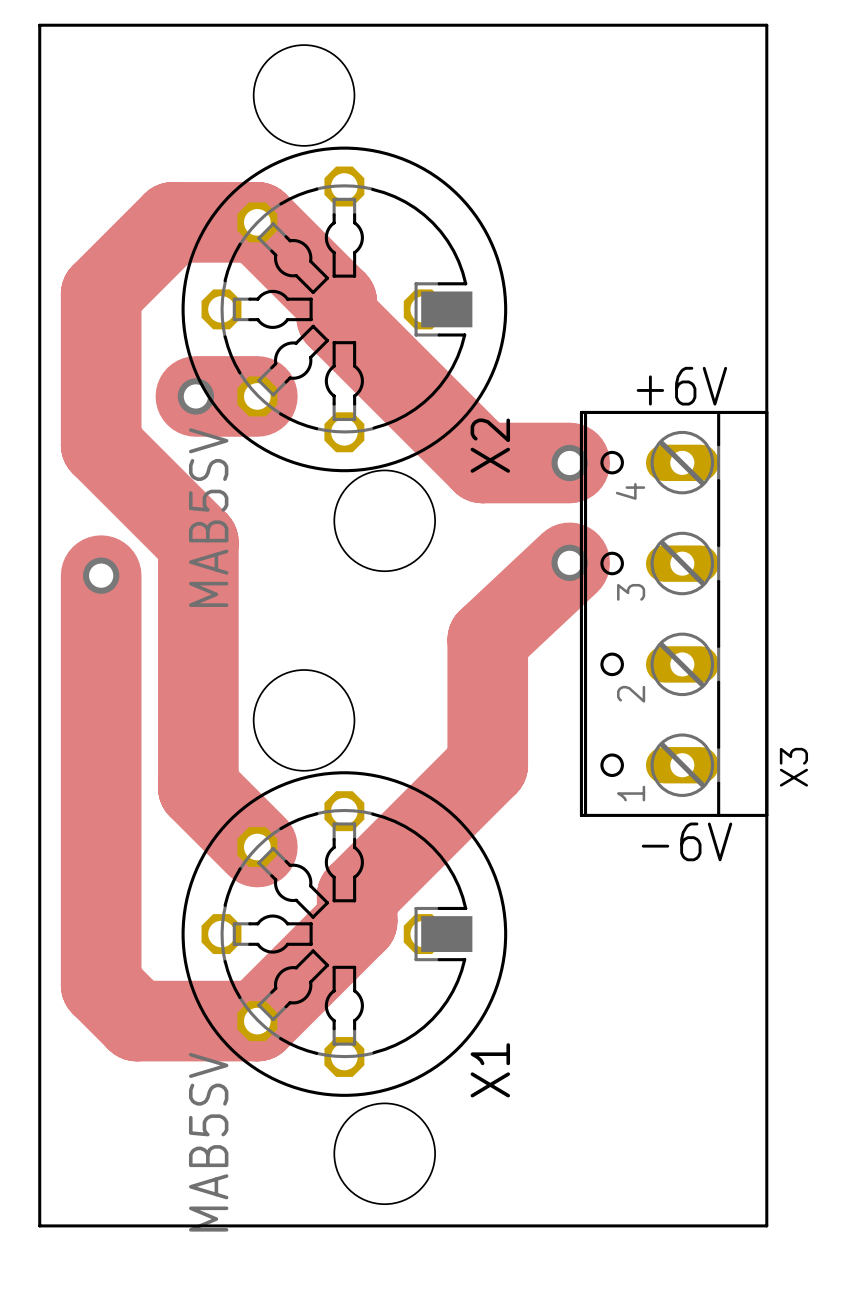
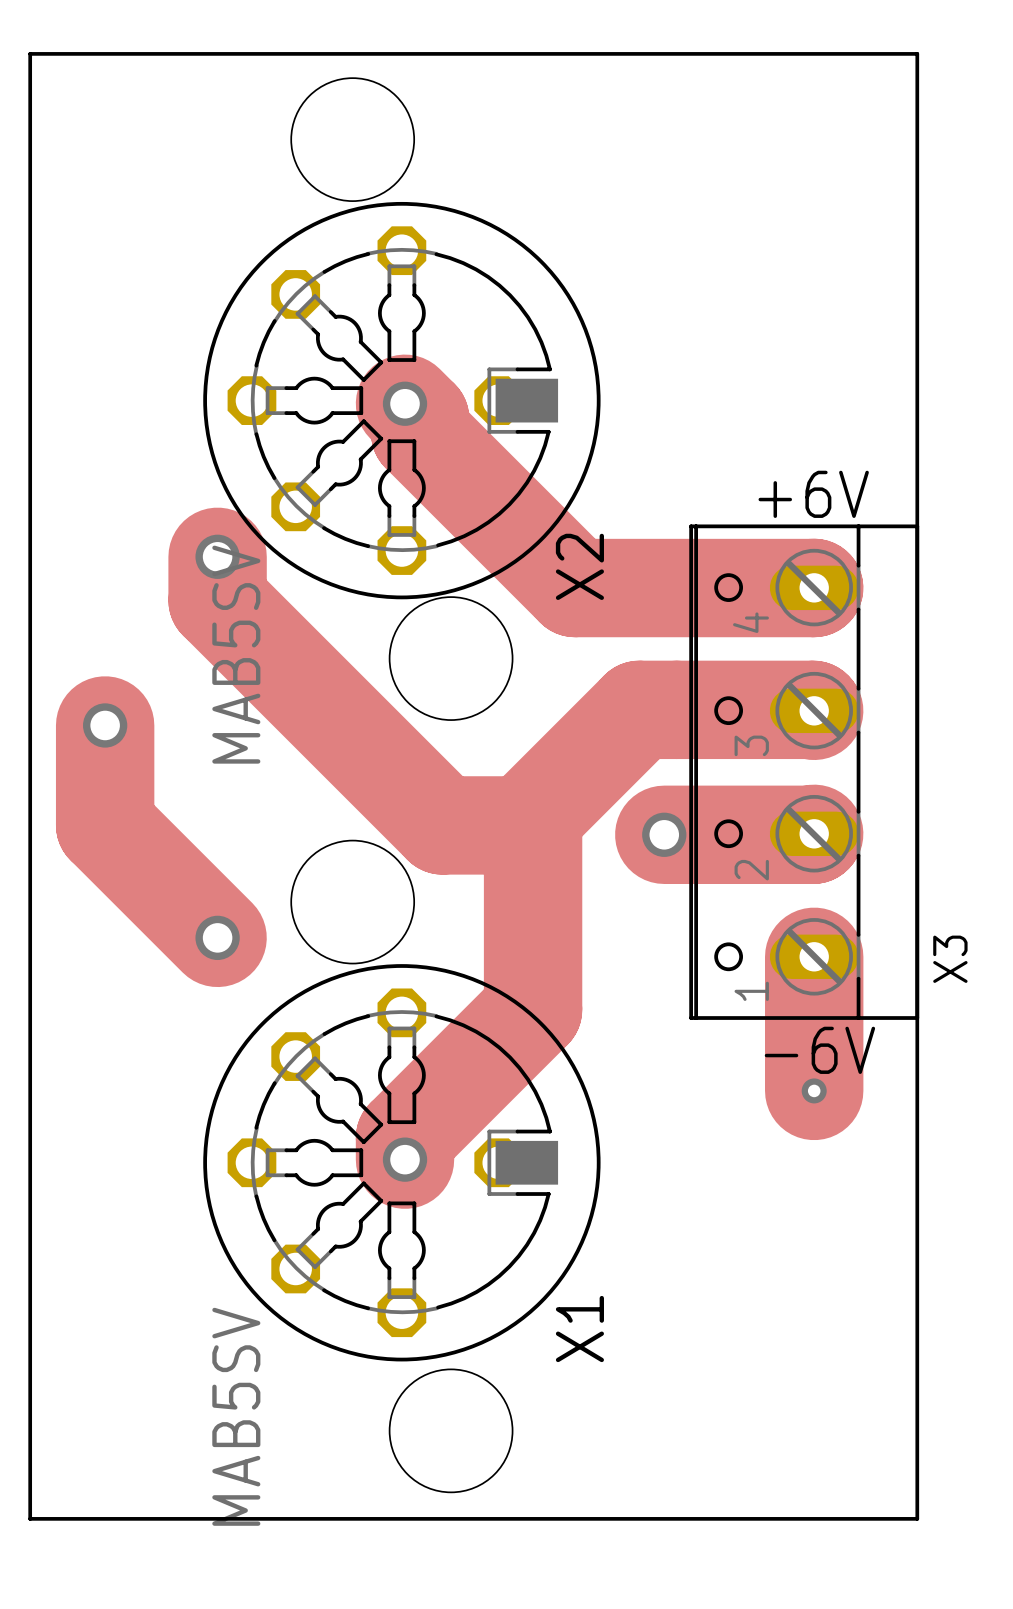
via: none -> (405, 403)
track: (195, 396) (257, 396) -> none
via position: (195, 396) -> (217, 556)
track: none -> (217, 556) (217, 600) (442, 825) (533, 825)
track: (486, 463) (482, 463) (336, 317) (336, 301) (257, 222) (172, 222) (101, 294) (101, 445) (198, 542) (198, 788) (257, 847) -> (575, 588) (420, 433) (420, 418) (405, 403)
track: none -> (676, 588) (814, 588)
via: (569, 463) -> none
track: (569, 562) (487, 639) (487, 765) (357, 895) (357, 921) (257, 1021) (137, 1021) (101, 985) (101, 657) -> (217, 937) (105, 825)
via: (569, 562) -> none
track: none -> (814, 710) (639, 709) (533, 816) (533, 1009) (405, 1137) (405, 1159)
track: none -> (814, 833) (664, 834)
via: none -> (664, 834)
via: none -> (217, 937)
track: none -> (814, 956) (814, 1090)
via: none -> (814, 1090)
via: none -> (405, 1159)

